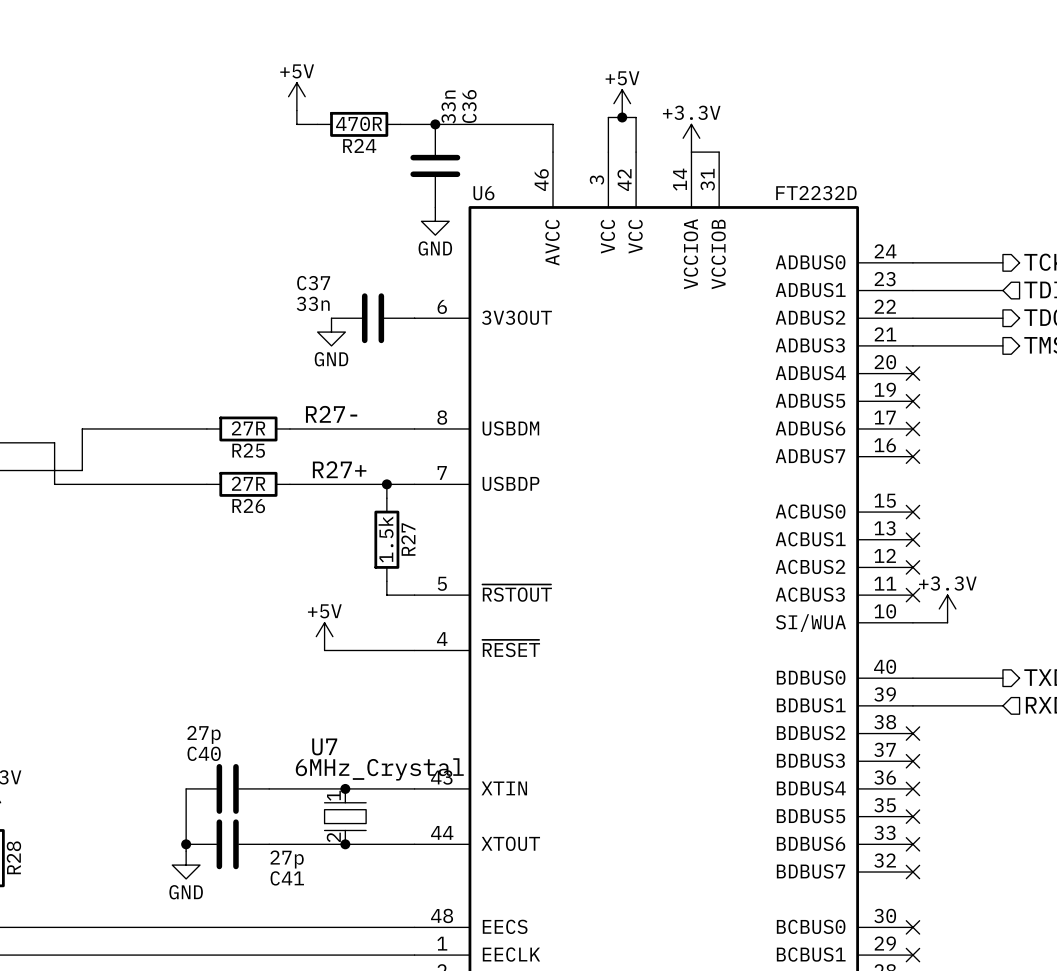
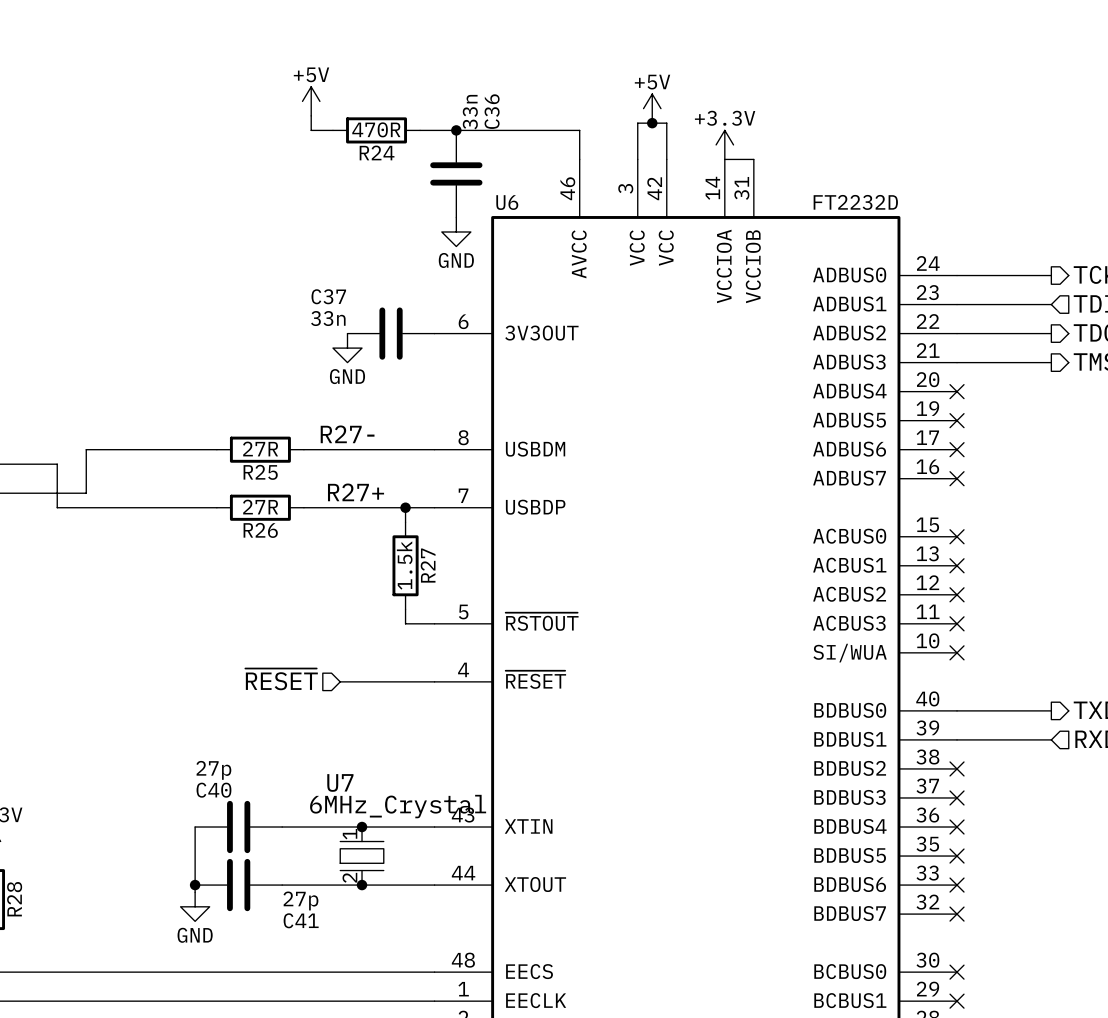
power symbol: +3.3V (947, 608) -> none
wire: (912, 622) (947, 622) -> none
no-connect mark: none -> (957, 652)
power symbol: +5V (324, 636) -> none
hierarchical label: none -> ~{RESET} (281, 679)

